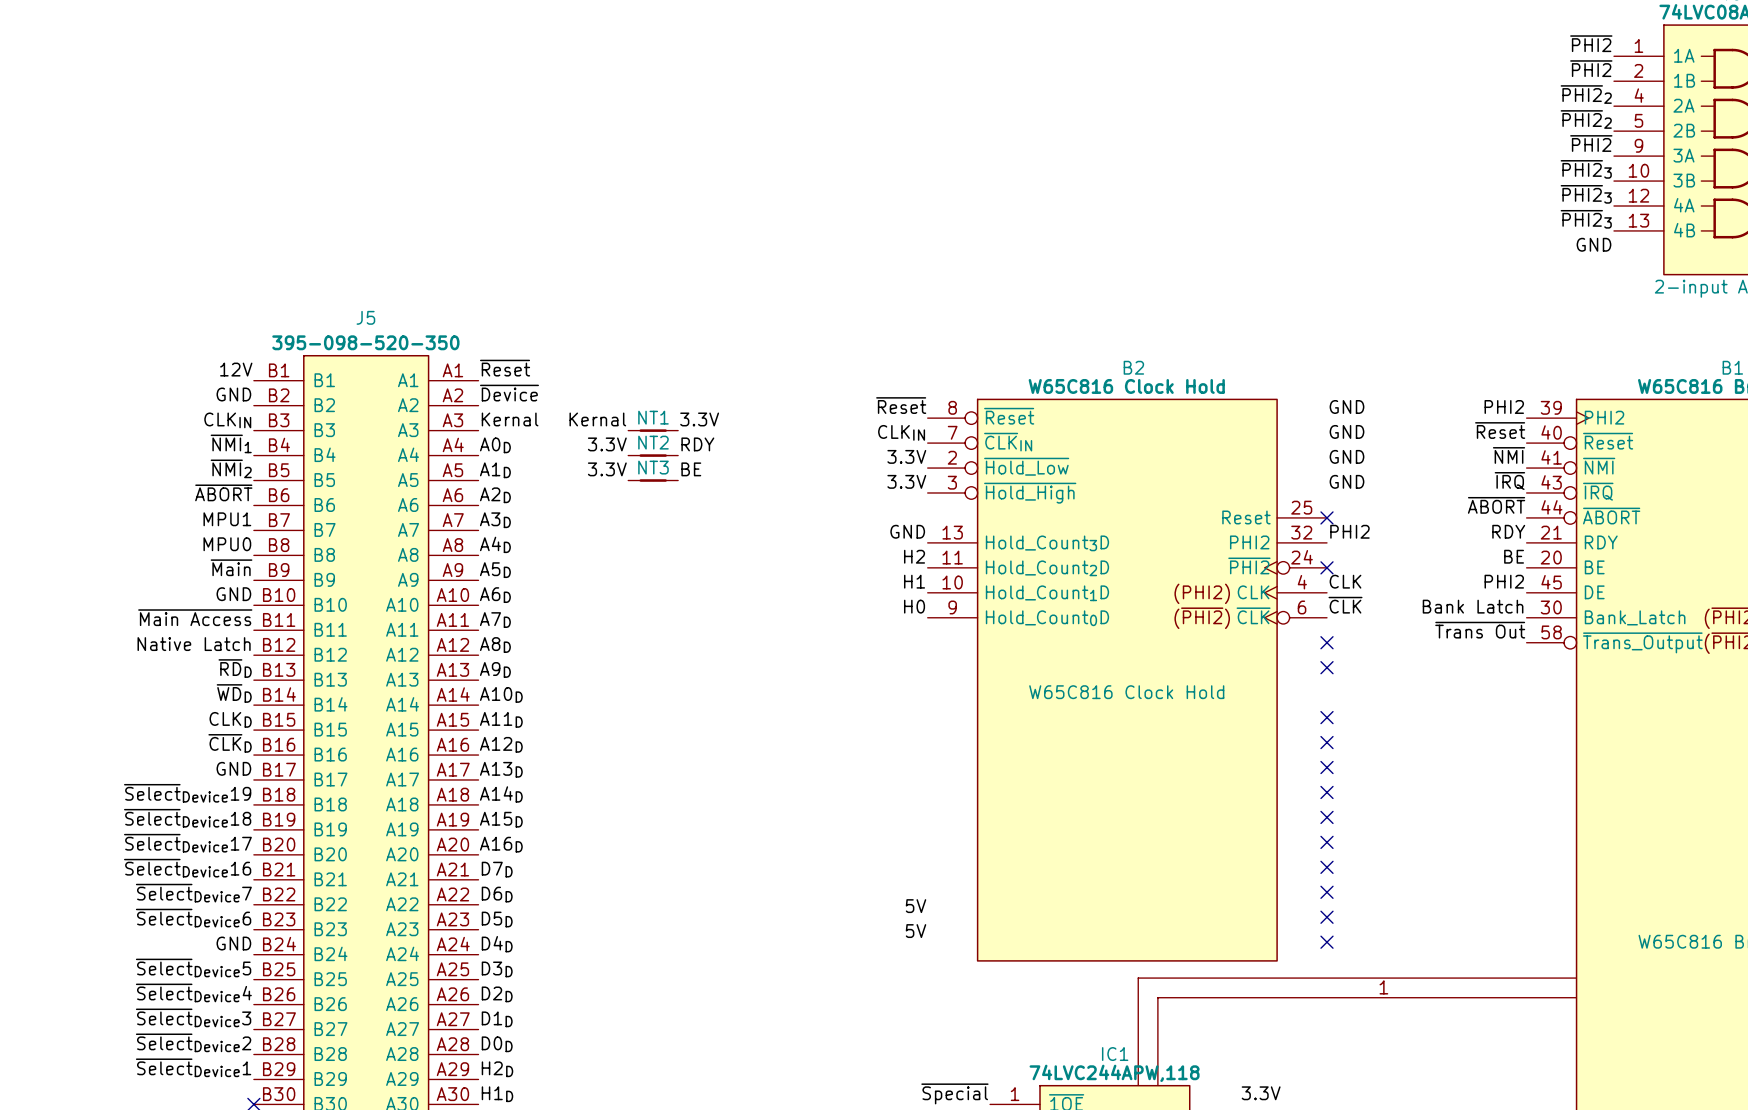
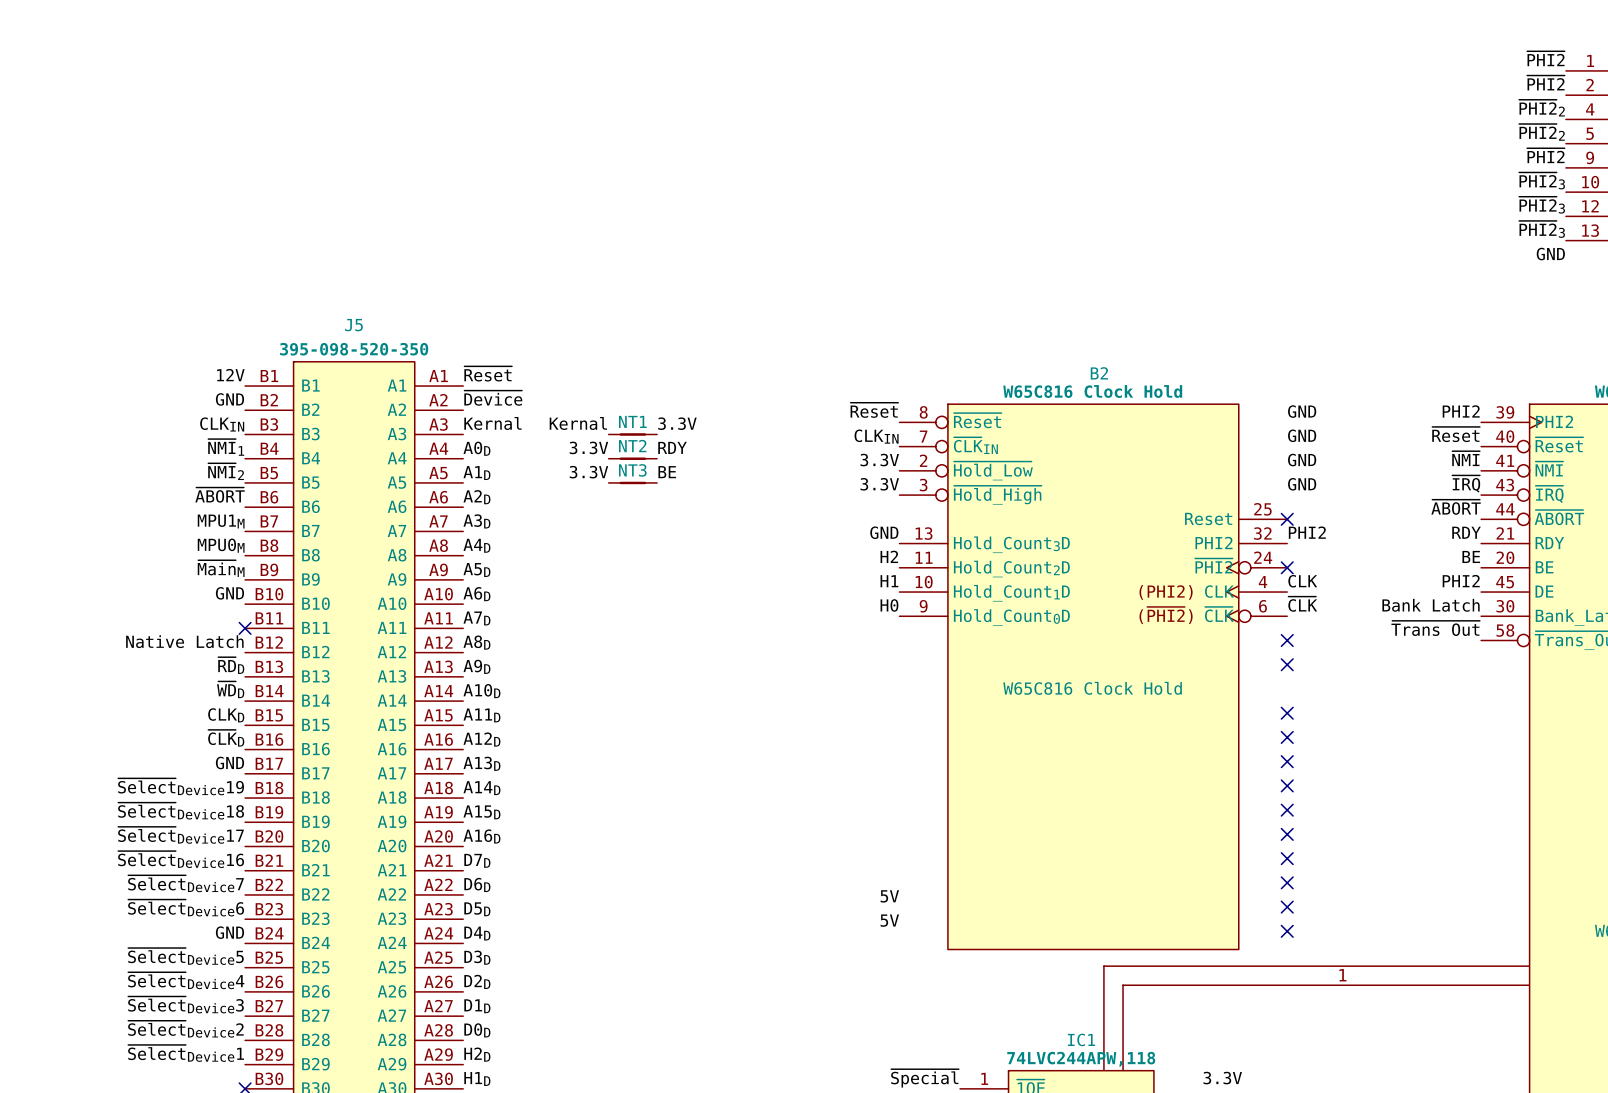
label: MPU1 (227, 519) -> MPU1M (221, 521)
label: MPU0 (227, 544) -> MPU0M (221, 545)
label: ~{Main} (231, 567) -> ~{Main}M (221, 568)
label: ~{Main Access} (195, 617) -> none
no-connect mark: none -> (245, 628)

